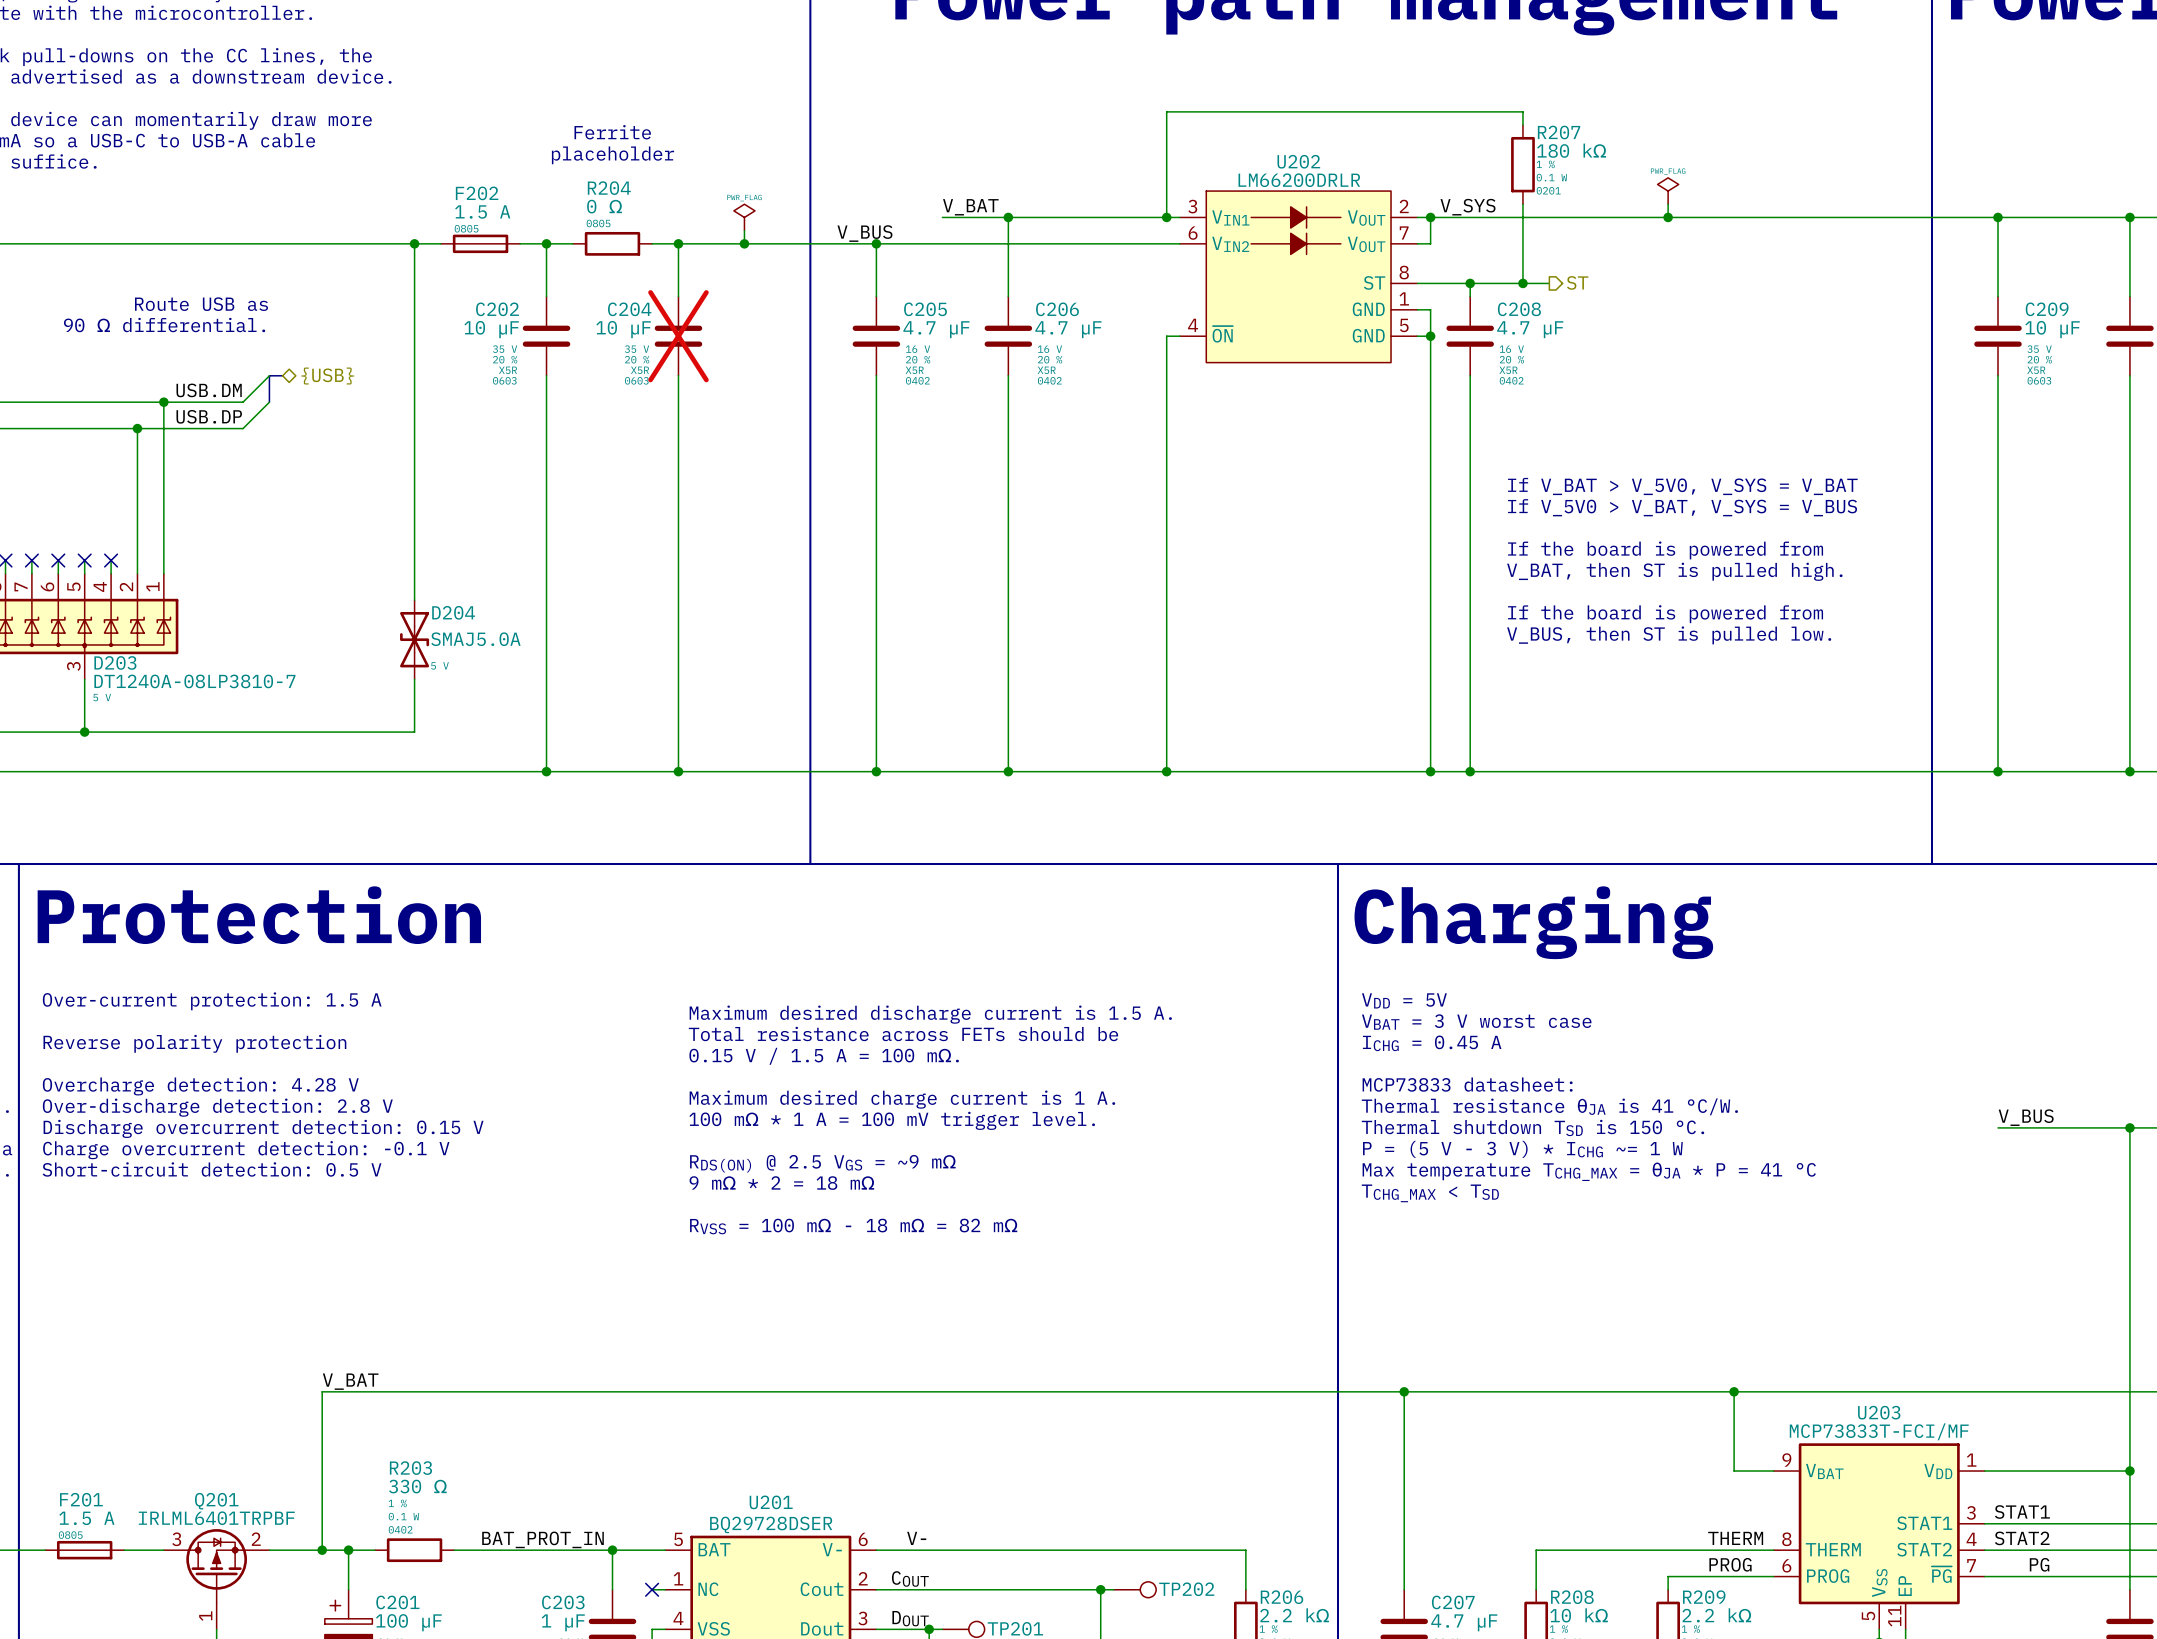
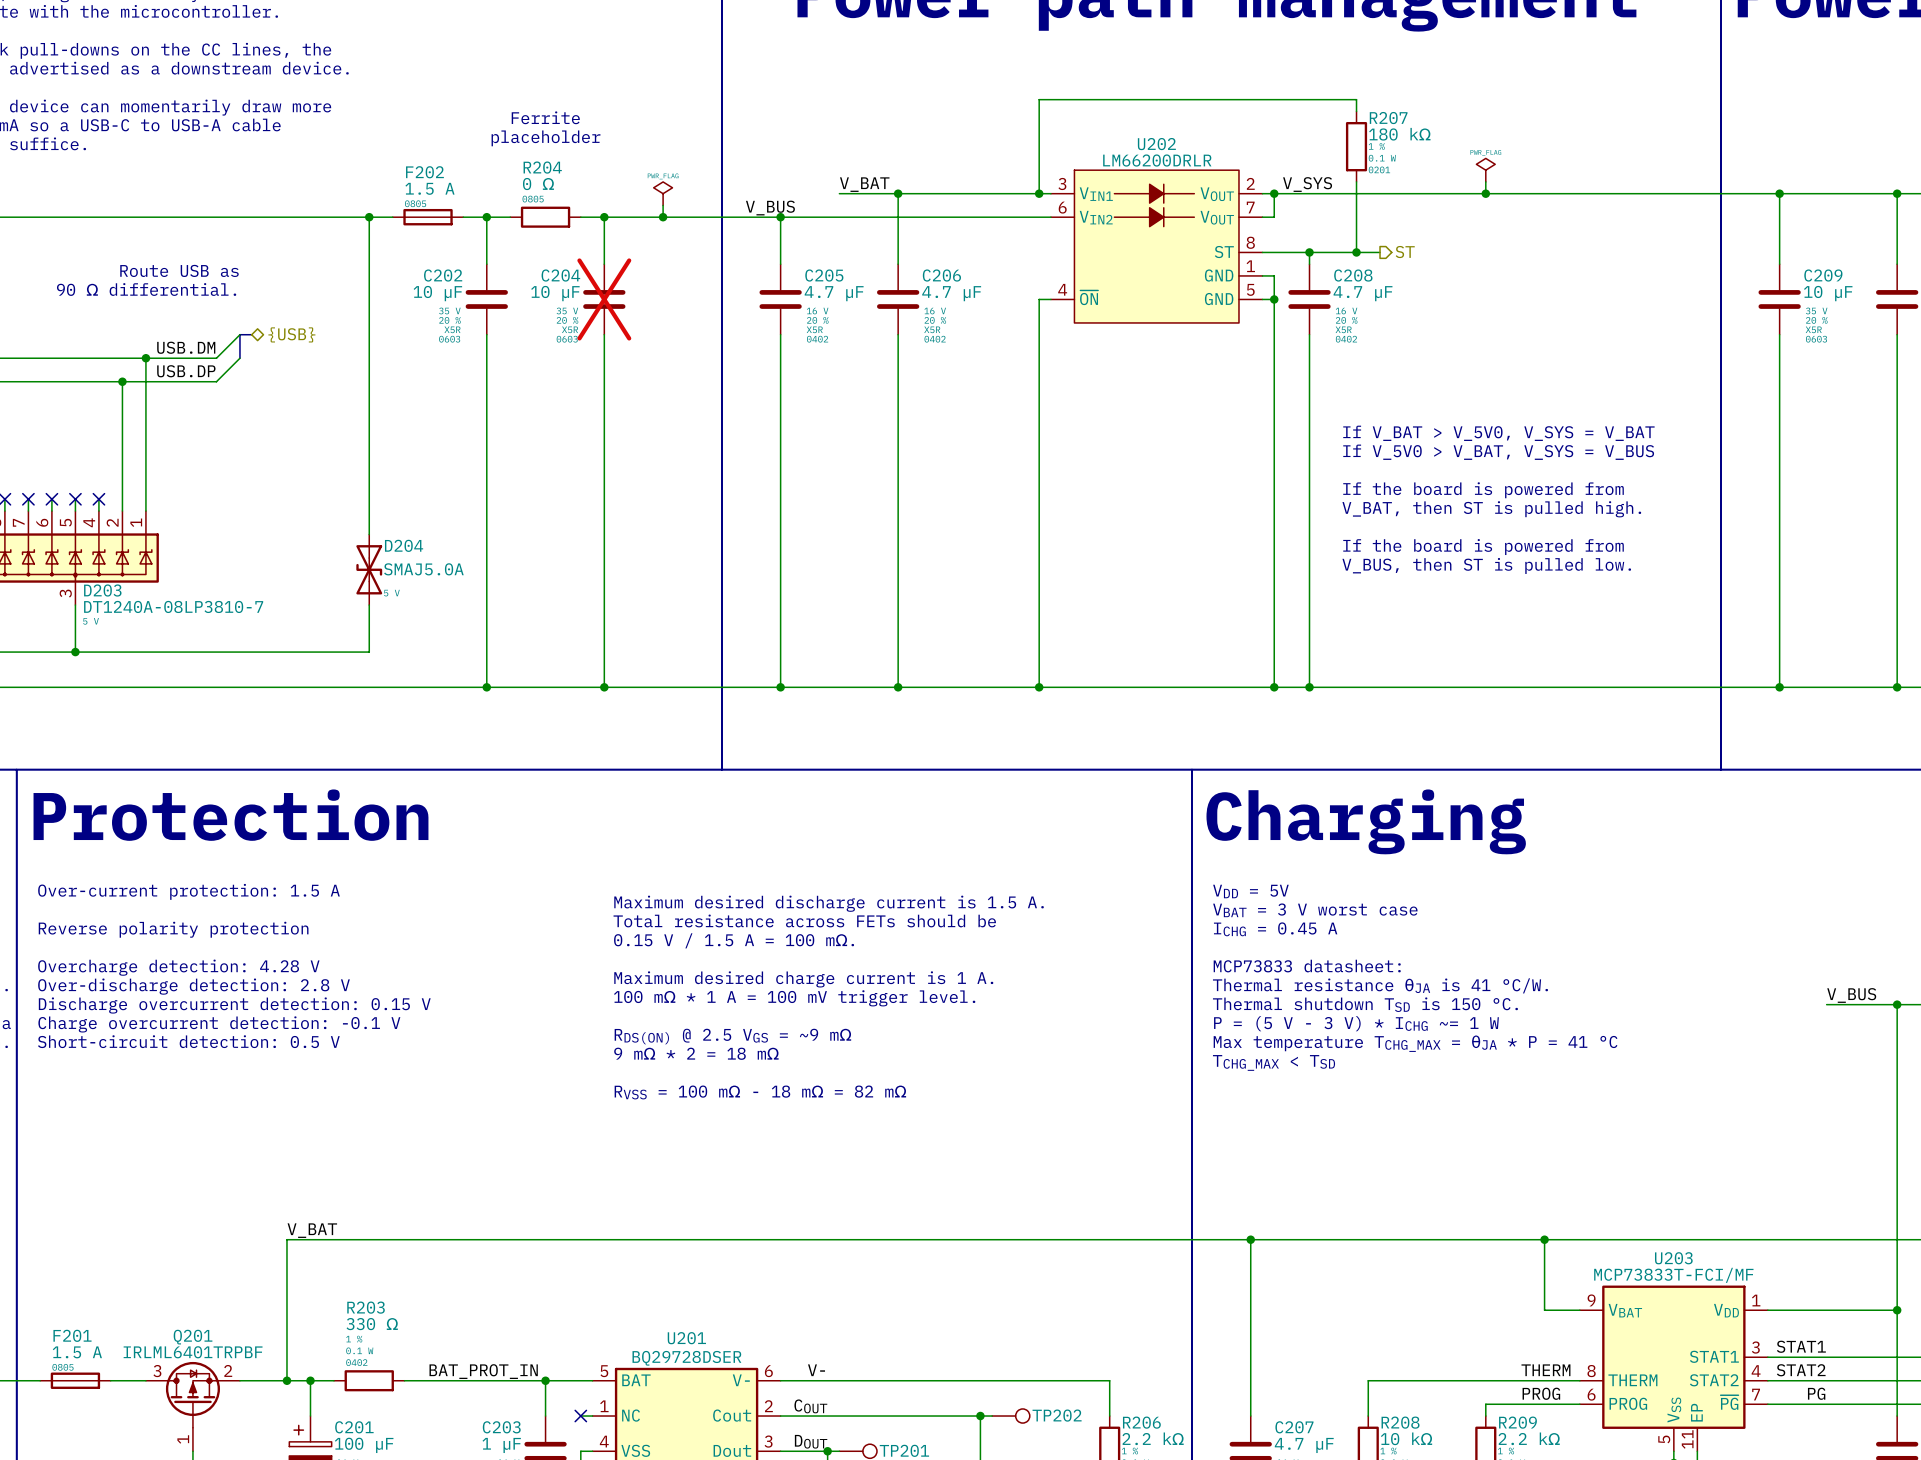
label position: V_BUS (2026, 1117) -> V_BUS (1851, 995)
wire: (1998, 1127) (2050, 1127) -> none

